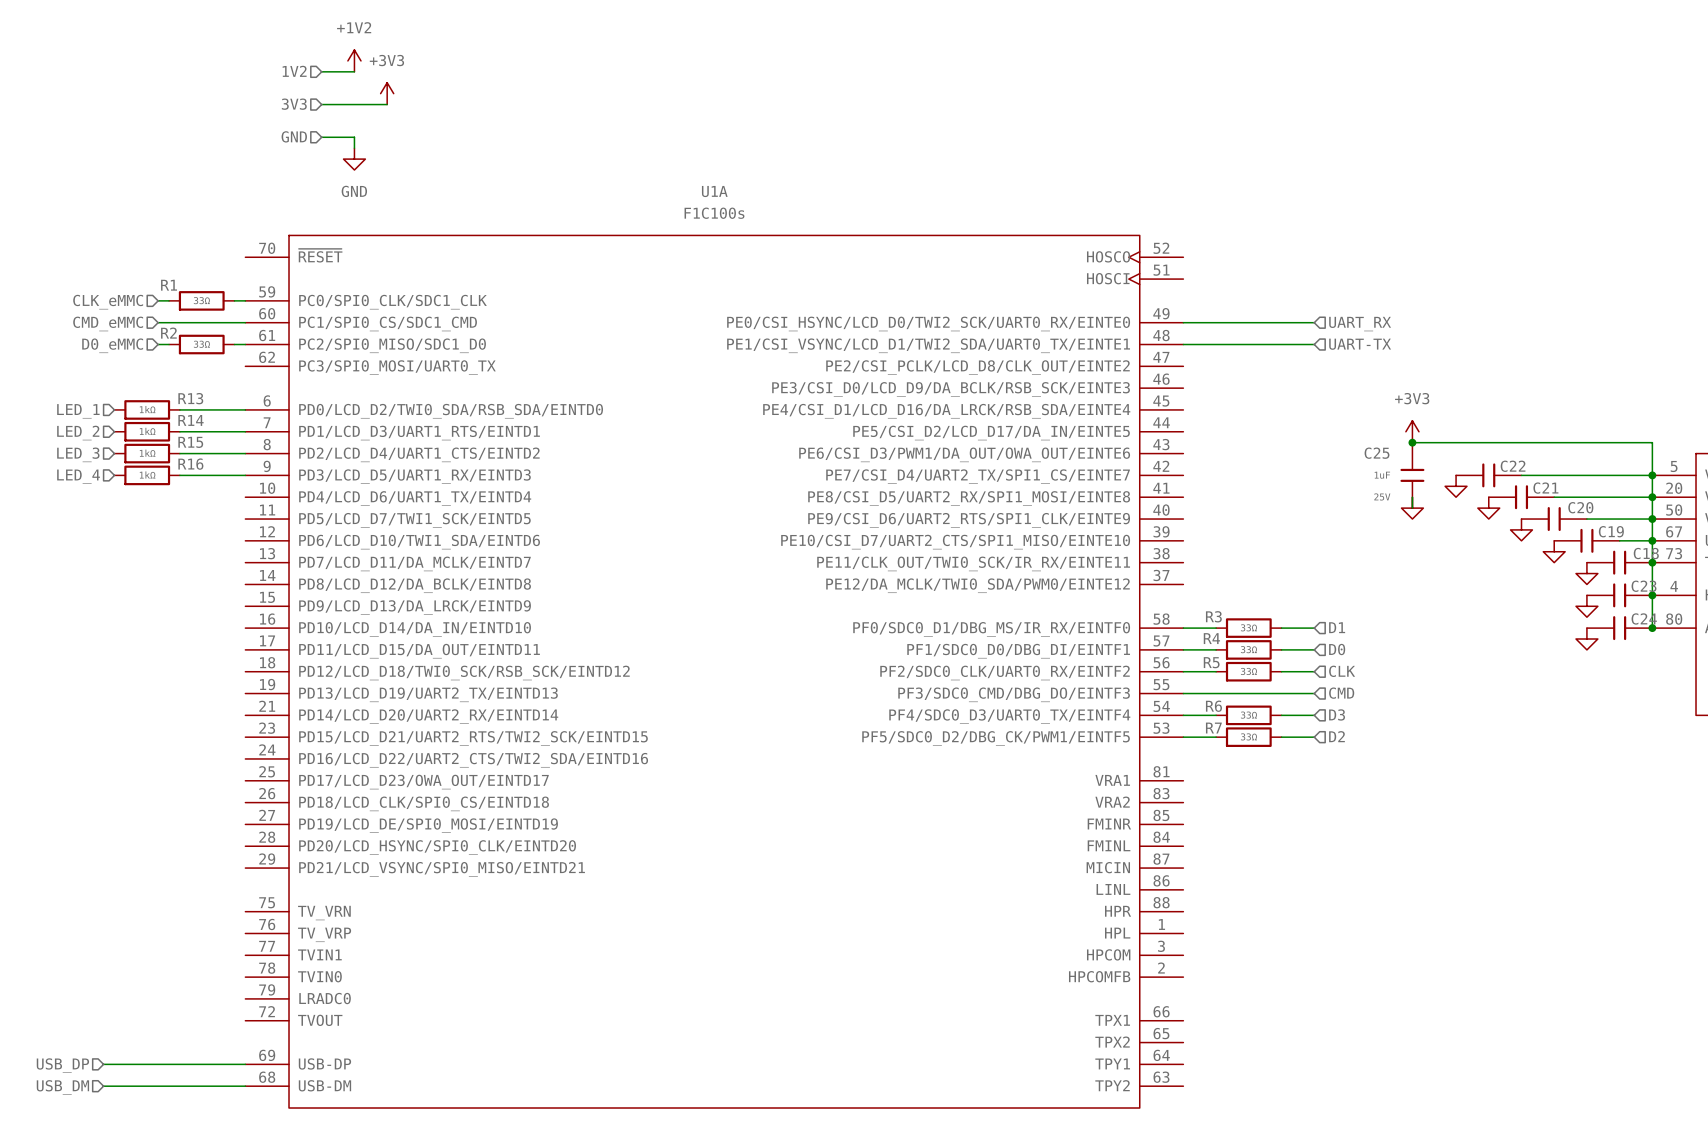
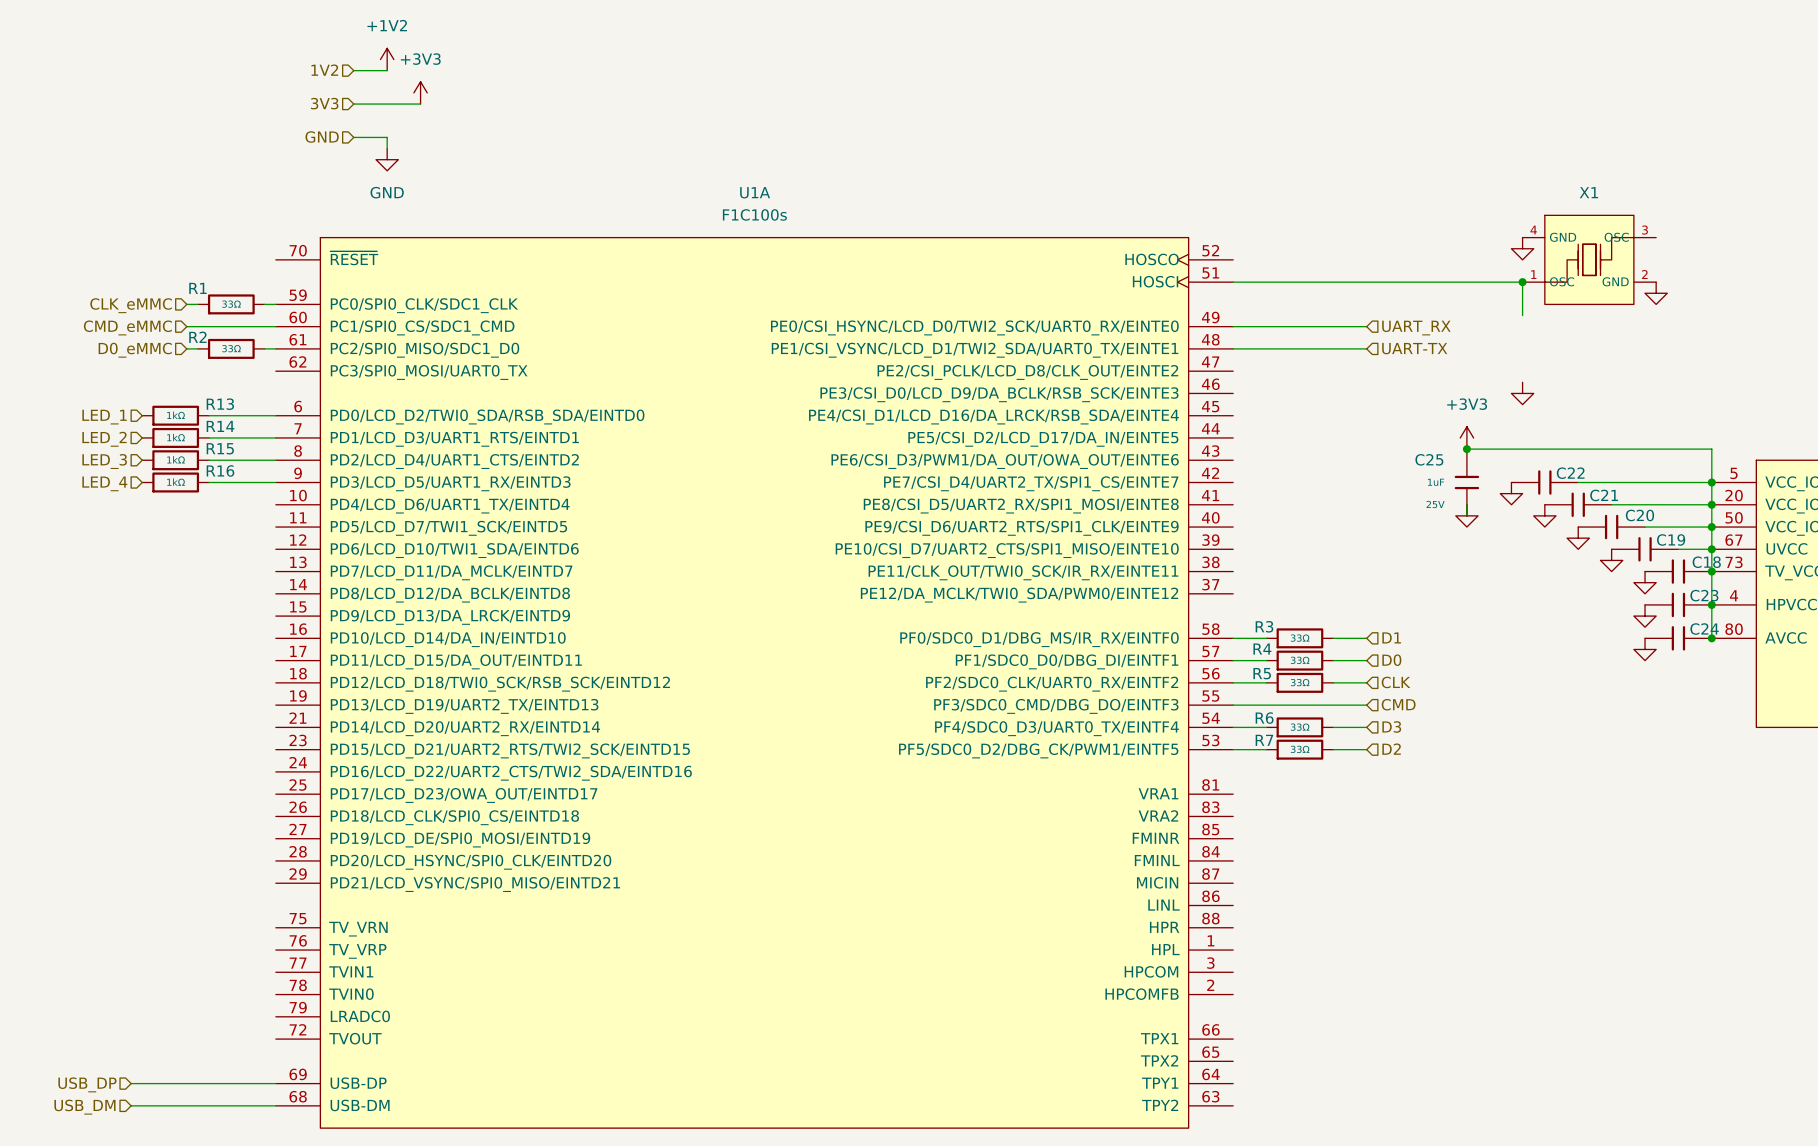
power symbol: none -> (1522, 248)
X1: none -> (1589, 259)
wire: none -> (1233, 282) (1522, 282) (1522, 315)
junction: none -> (1522, 282)
power symbol: none -> (1656, 293)
power symbol: none -> (1522, 393)

